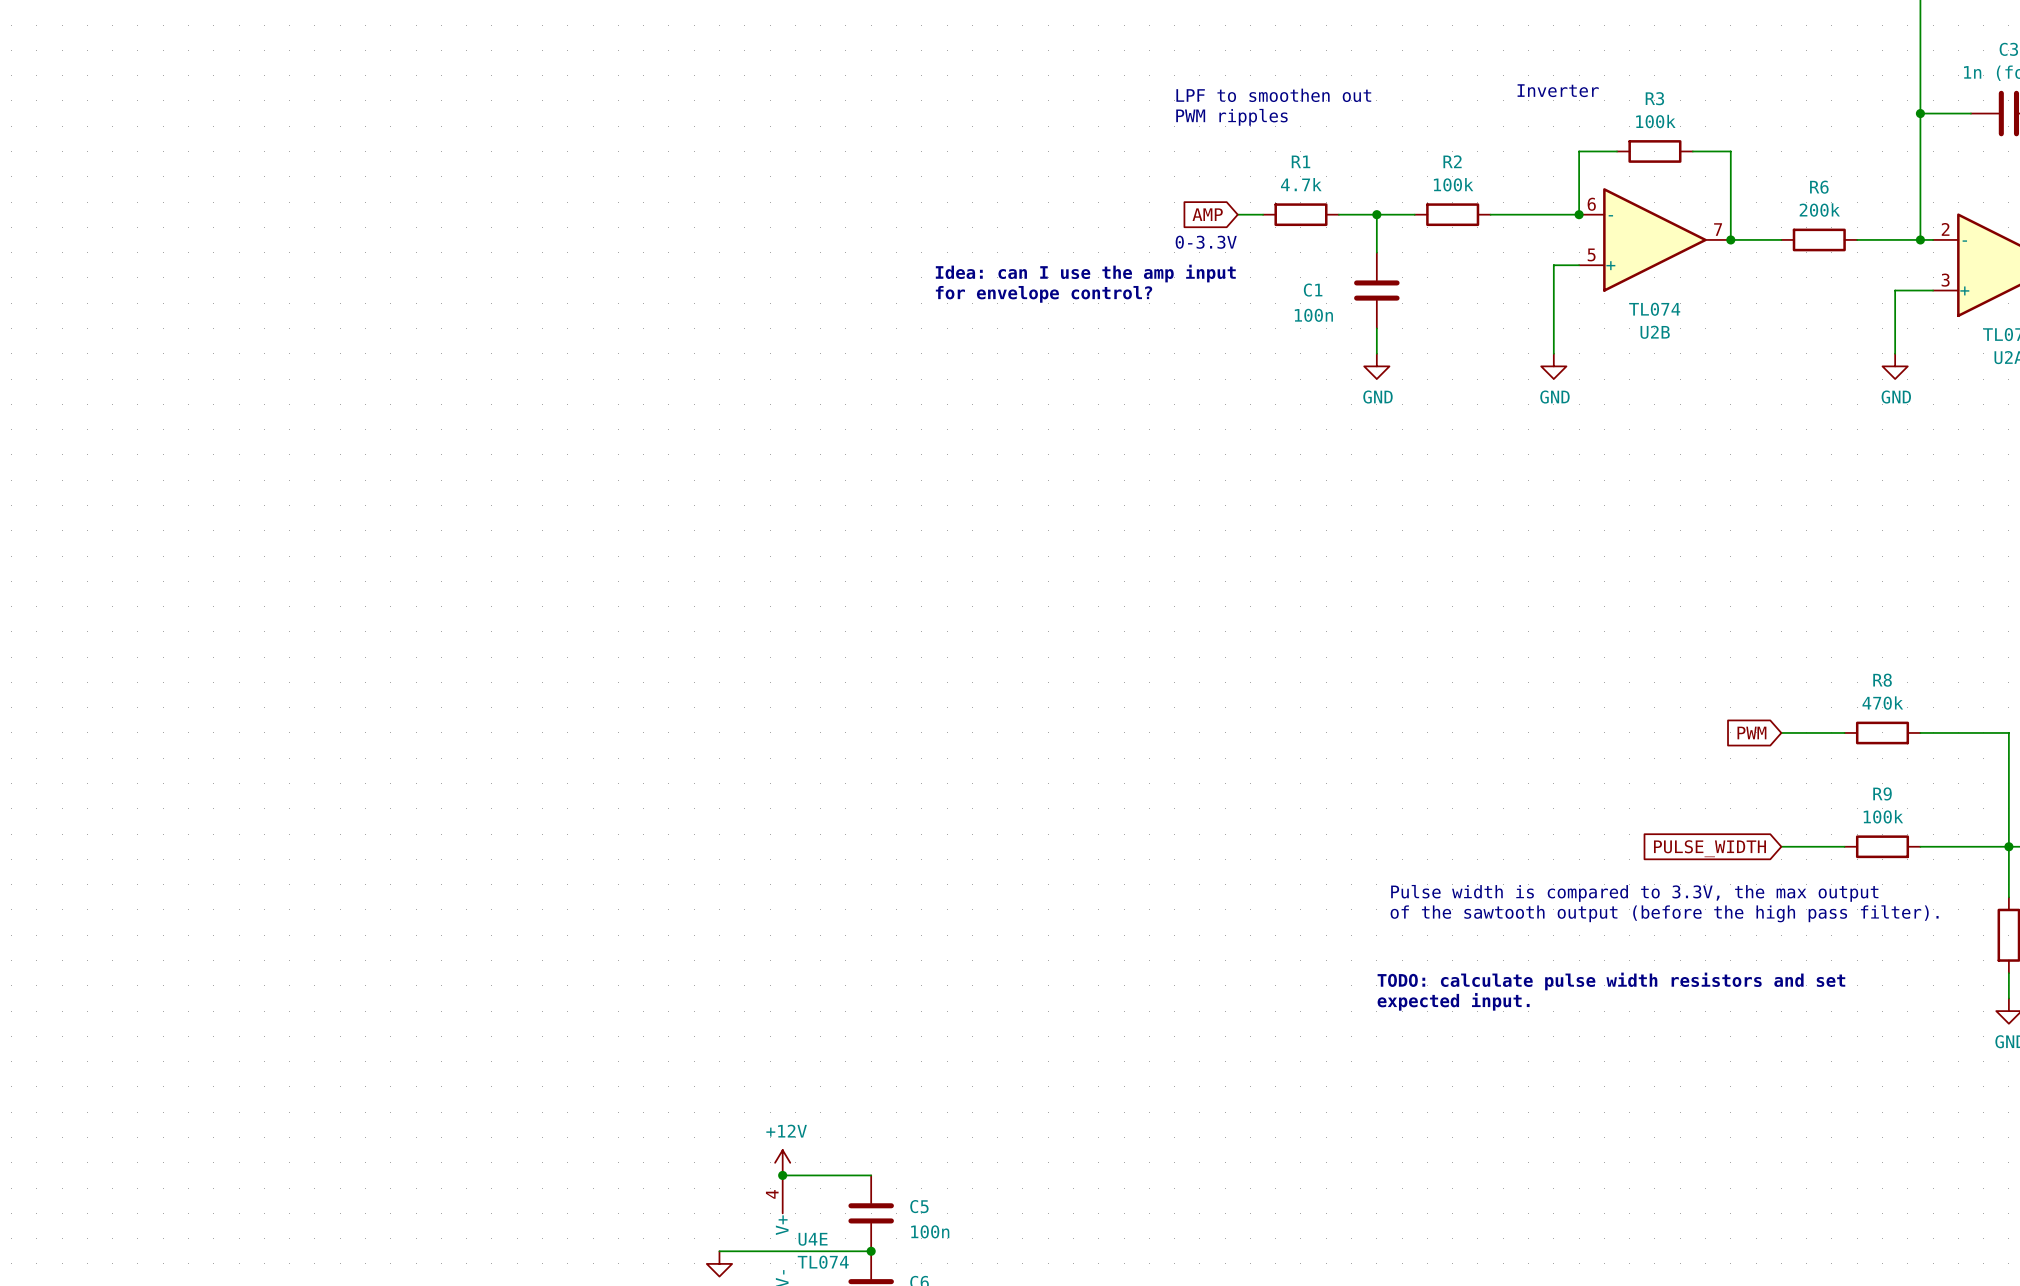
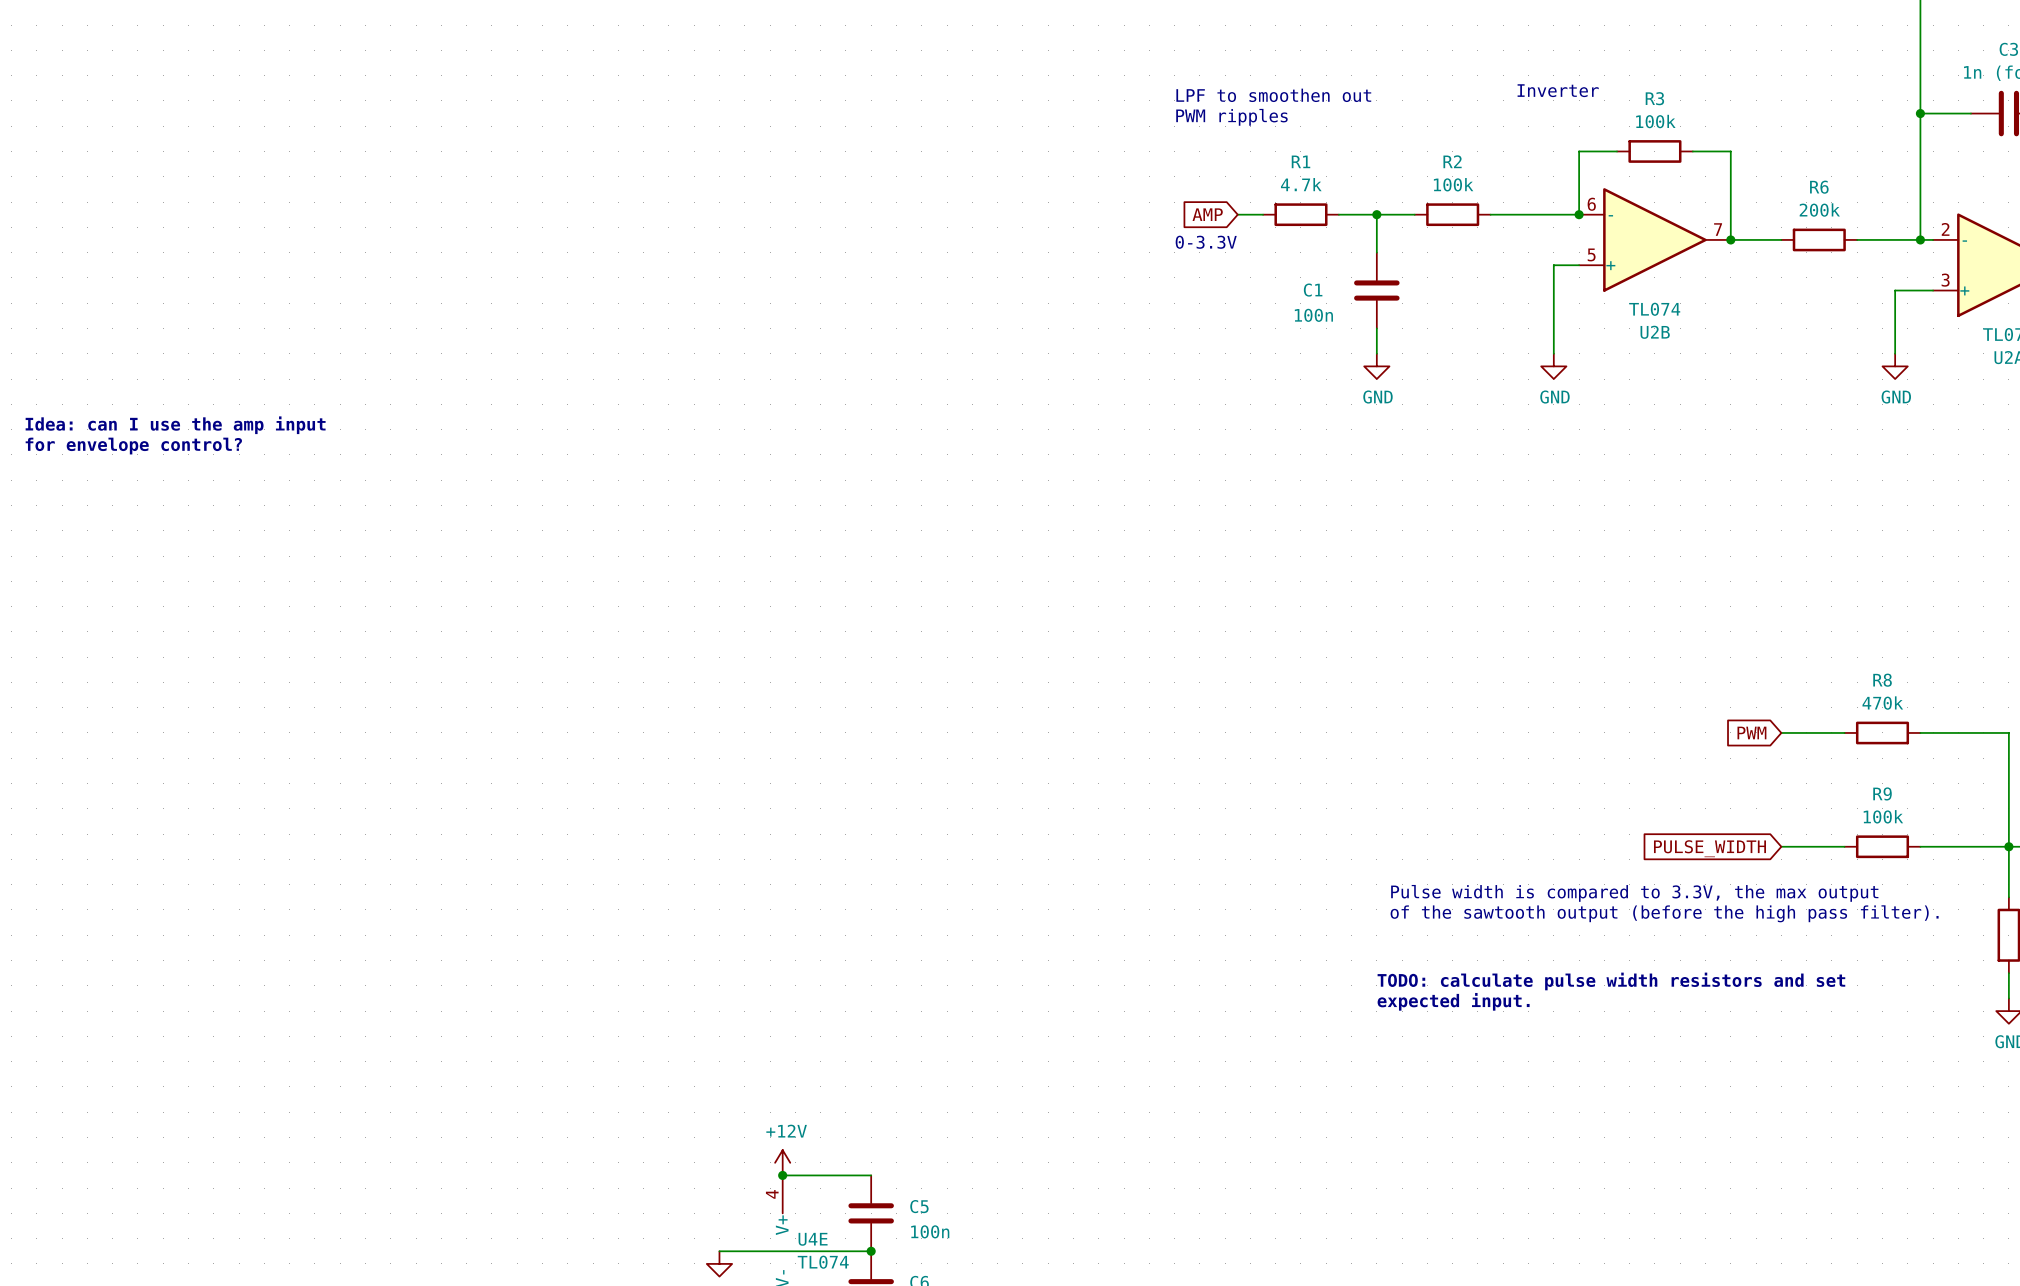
text: Idea: can I use the amp input (1085, 273) -> none
text: for envelope control? (1044, 294) -> none
text: none -> Idea: can I use the amp input (175, 425)
text: none -> for envelope control? (133, 446)

